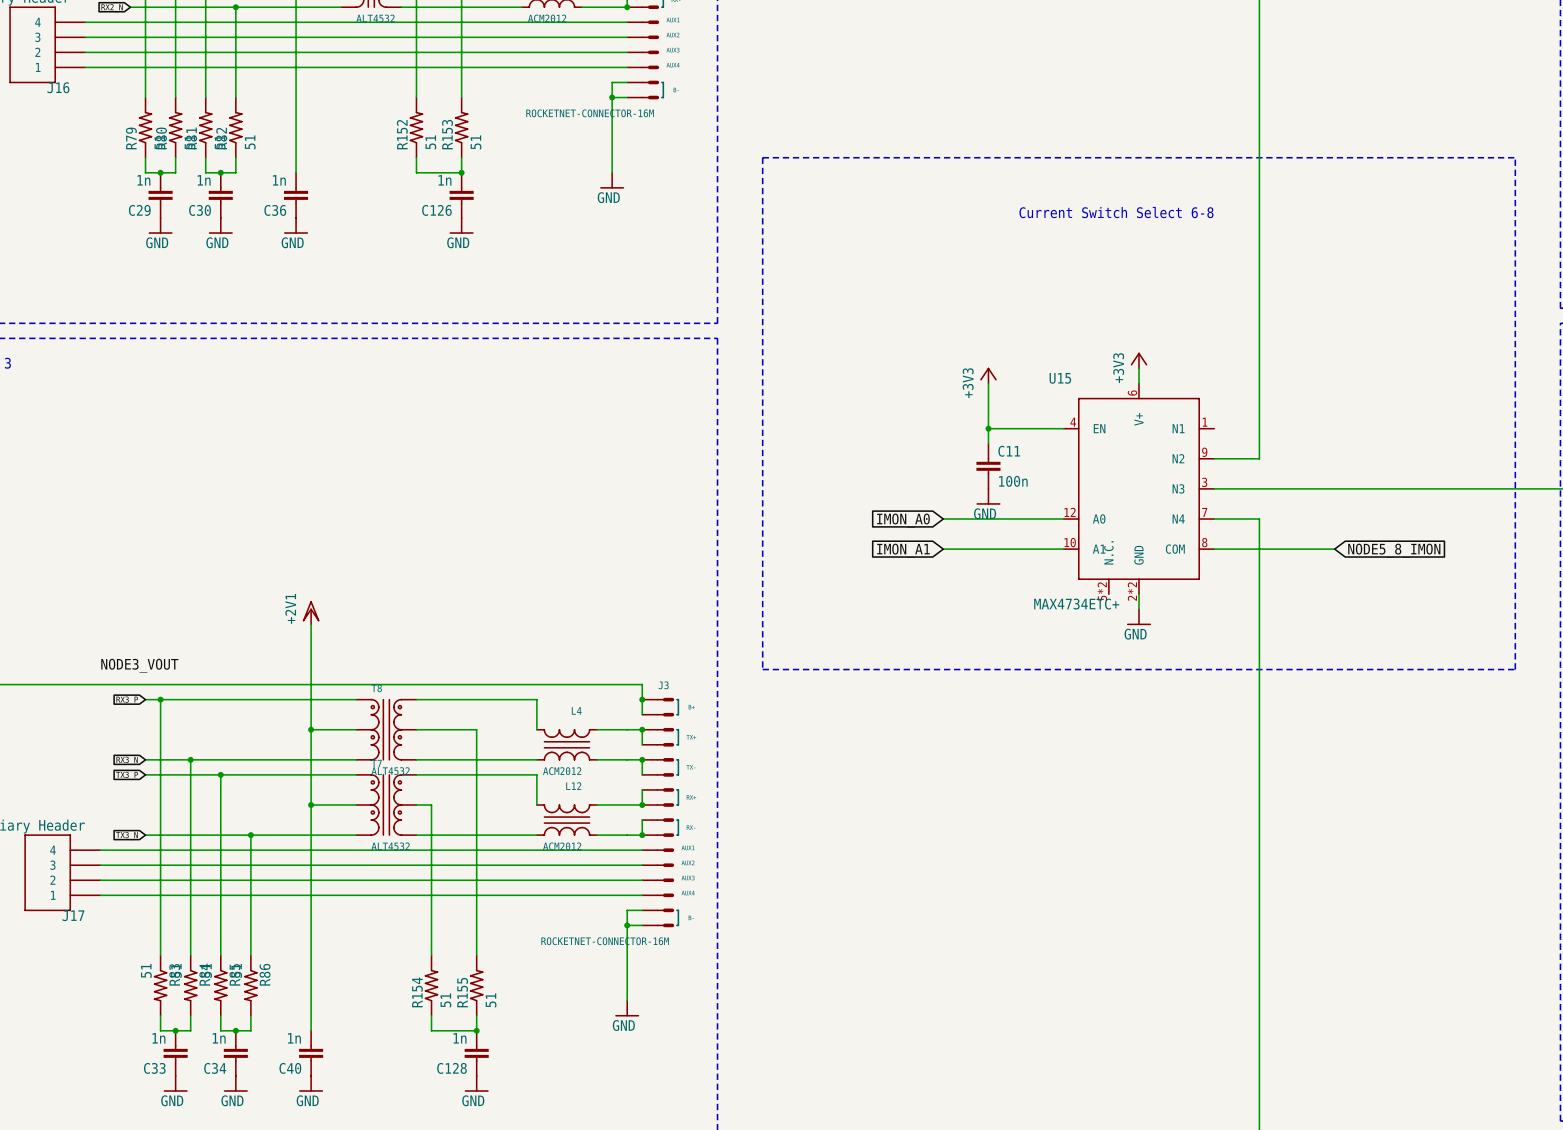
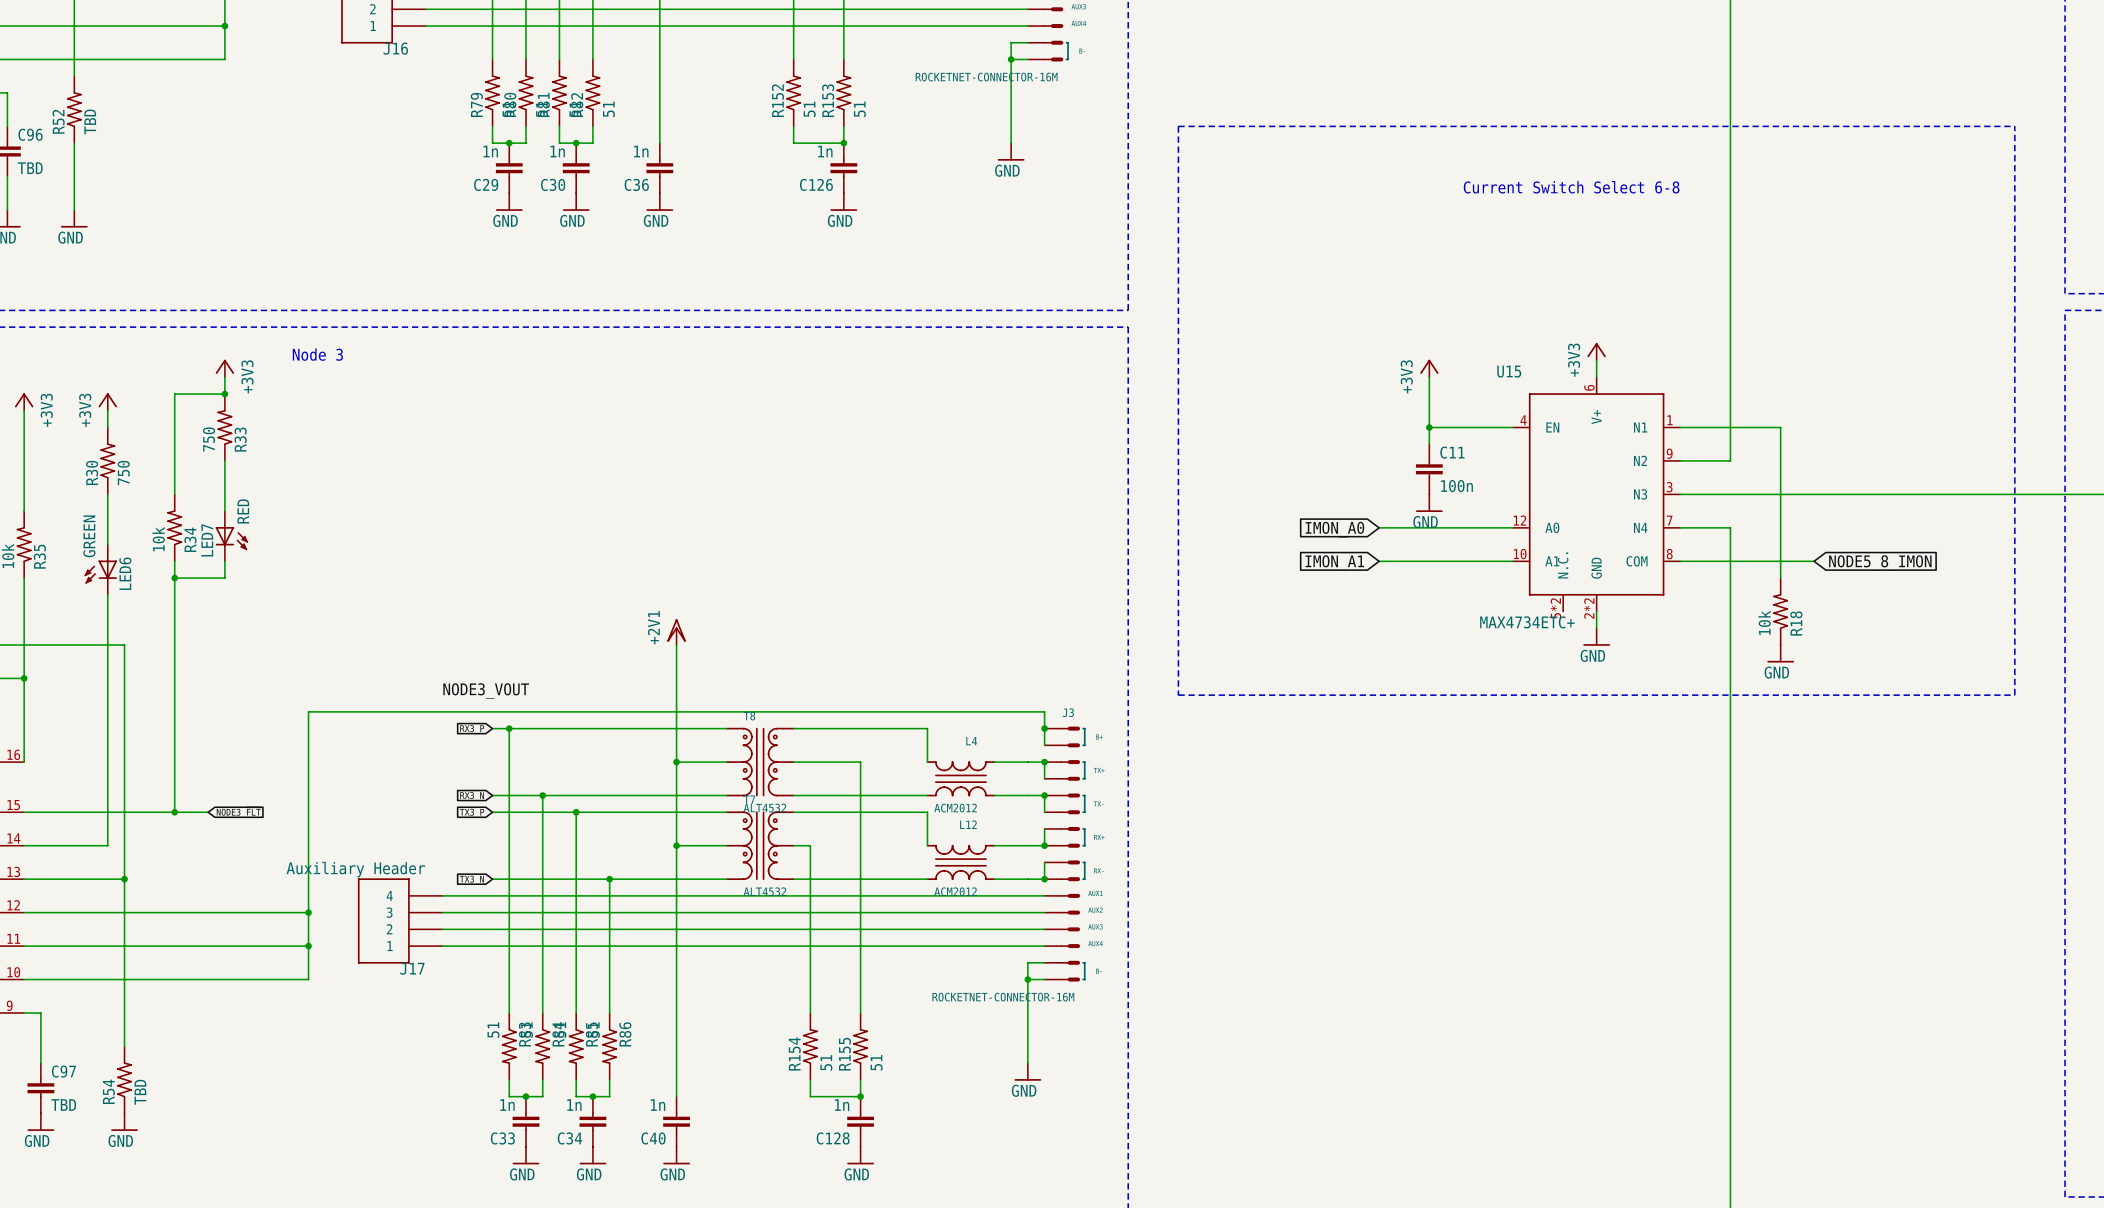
wire: none -> (1680, 427) (1780, 427) (1780, 578)
R18: none -> 10k (1780, 611)
power symbol: none -> GND (1780, 653)

